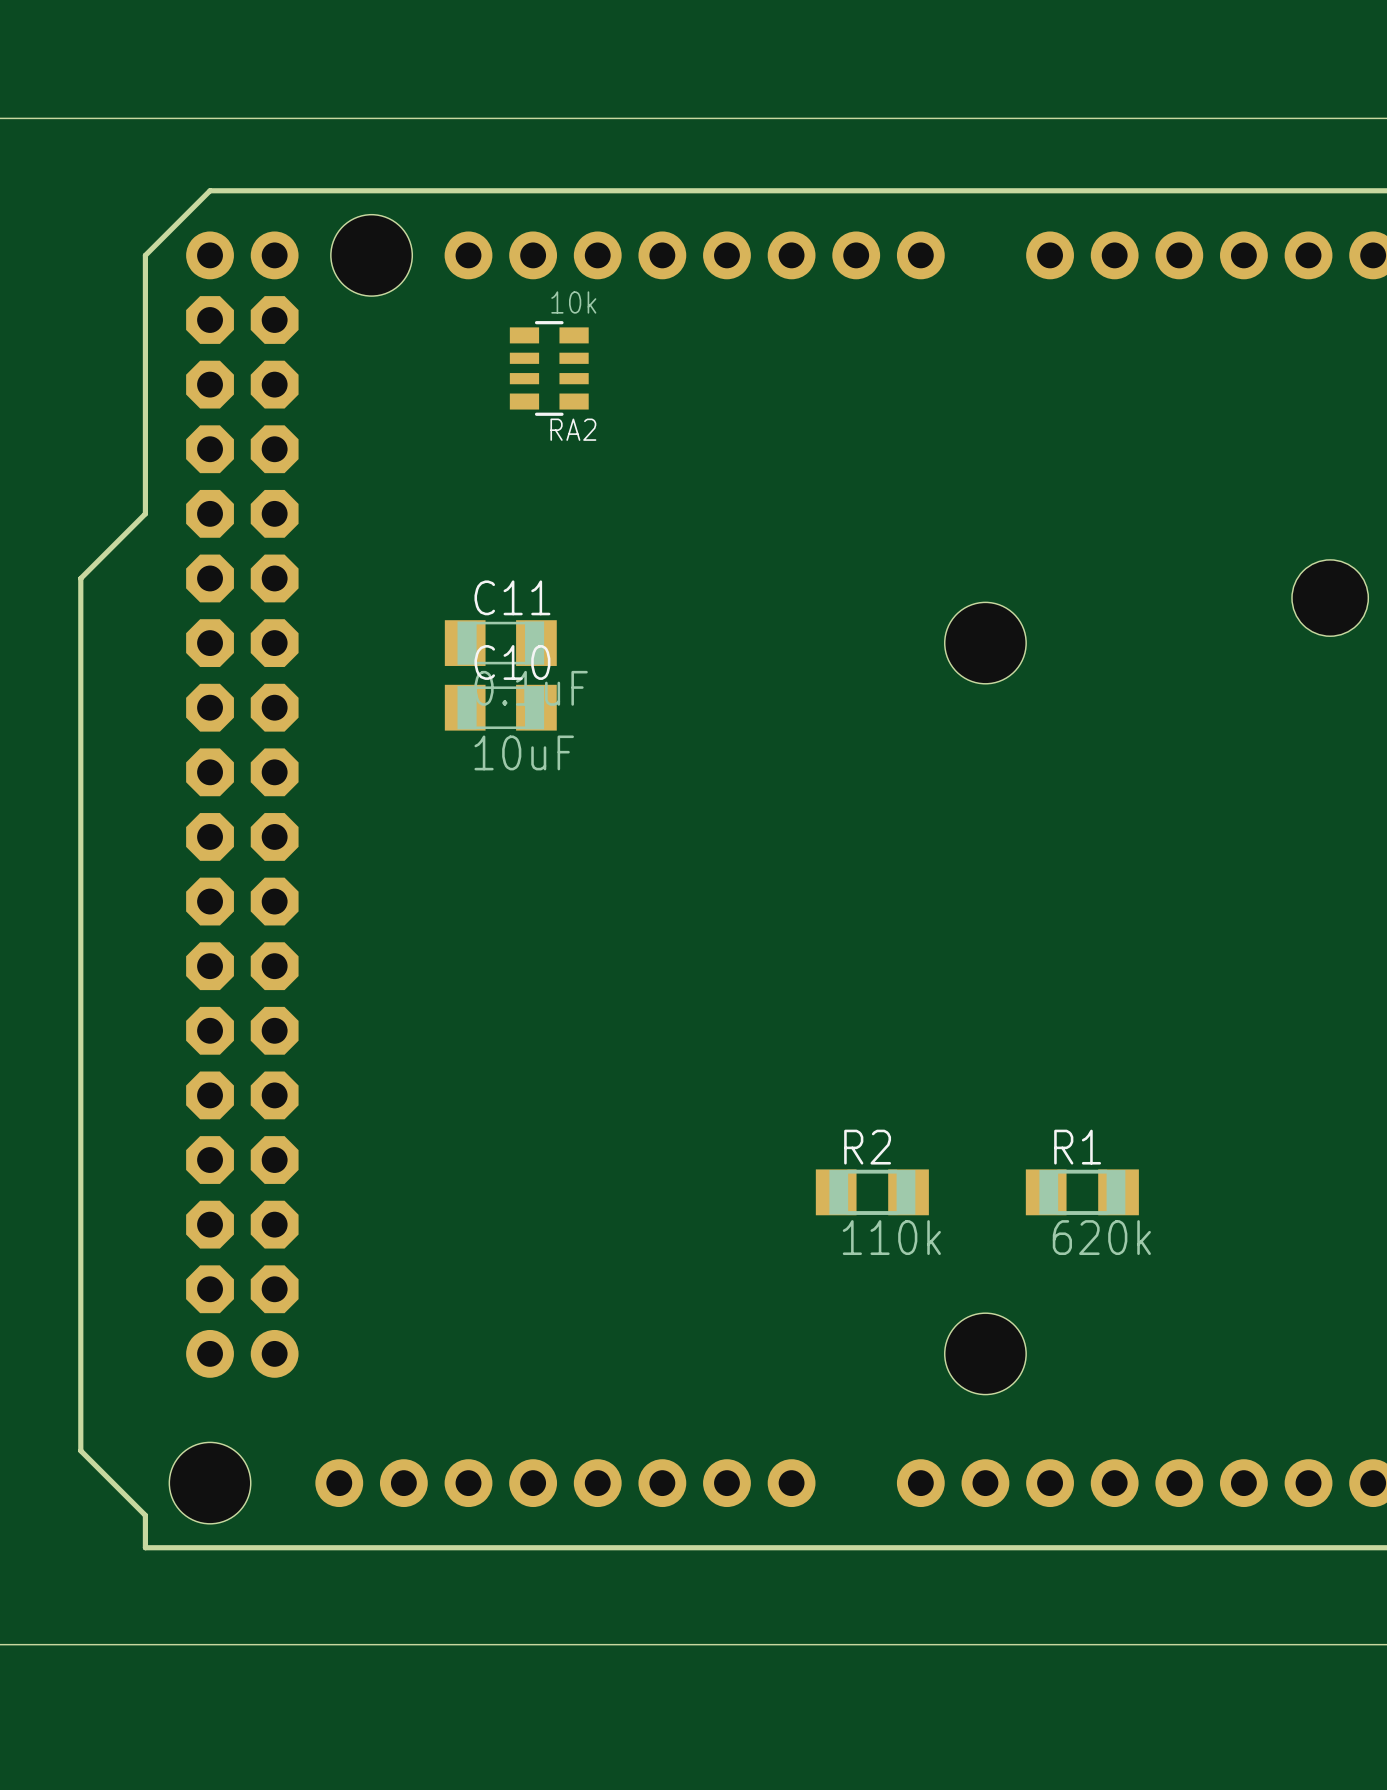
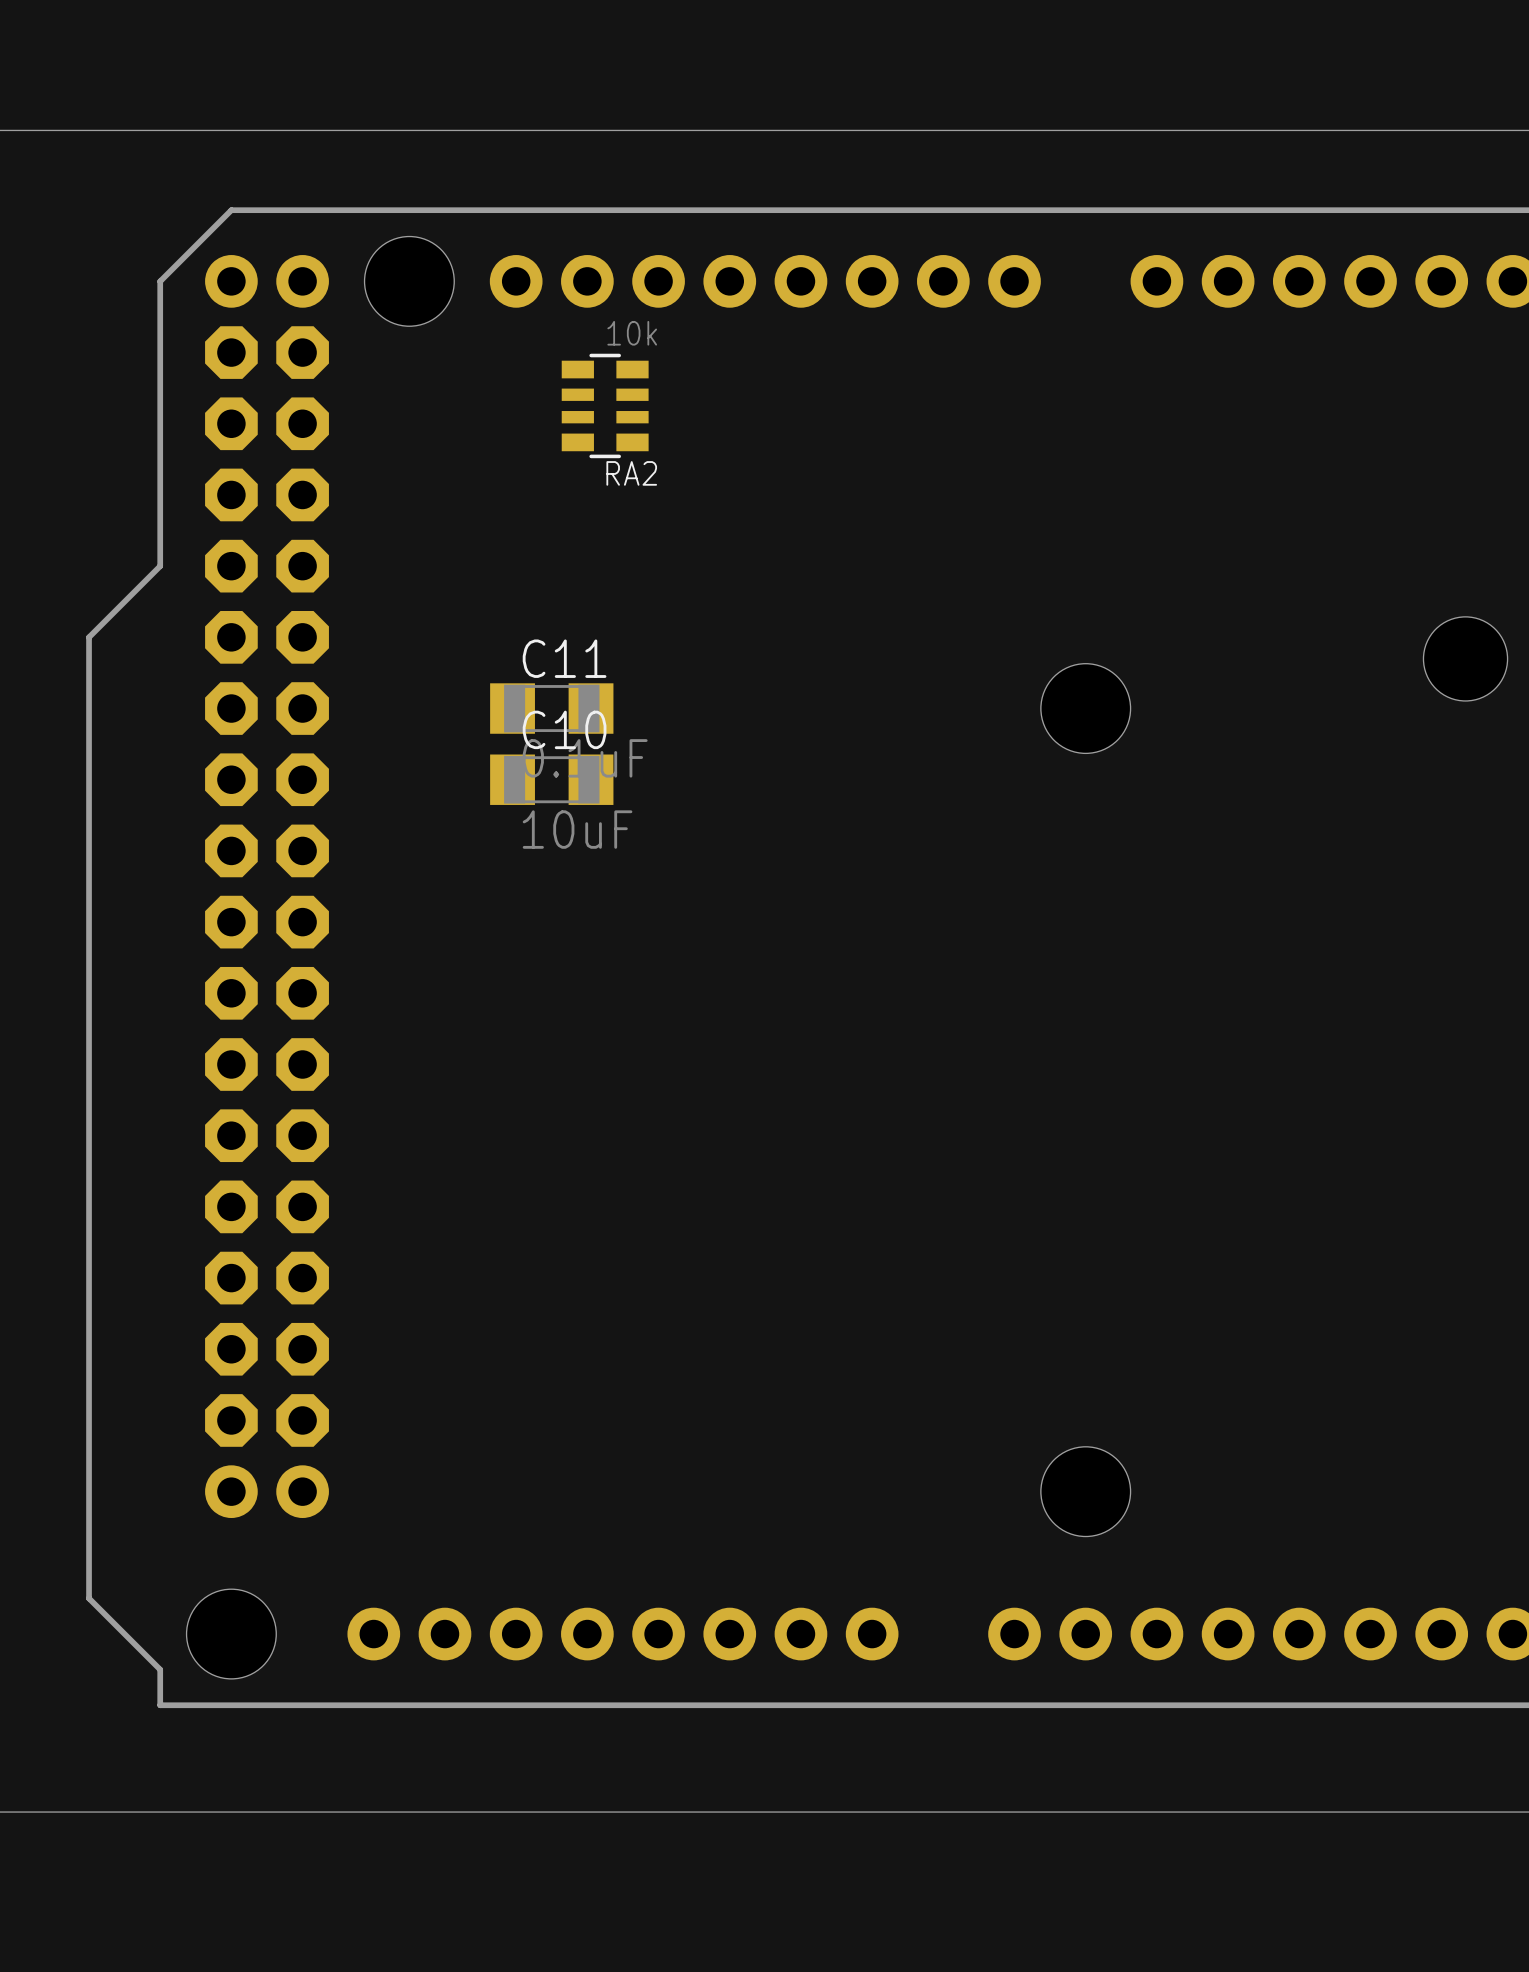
R2: 110k (872, 1192) -> none
R1: 620k (1082, 1192) -> none

